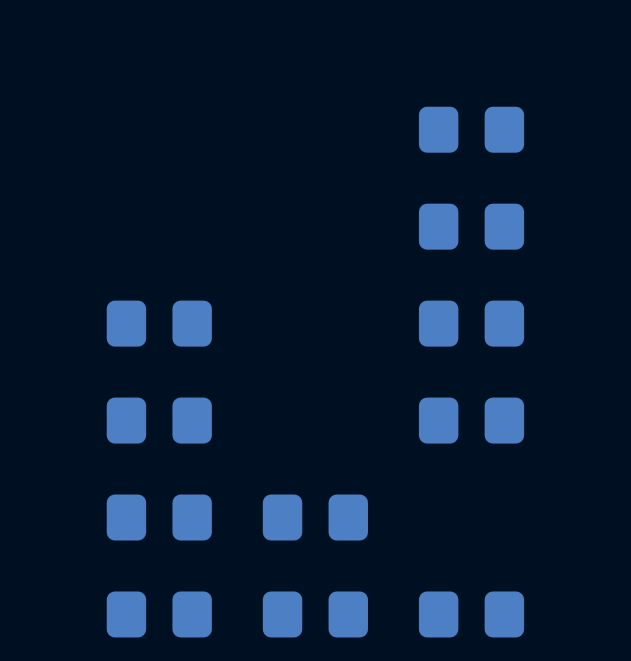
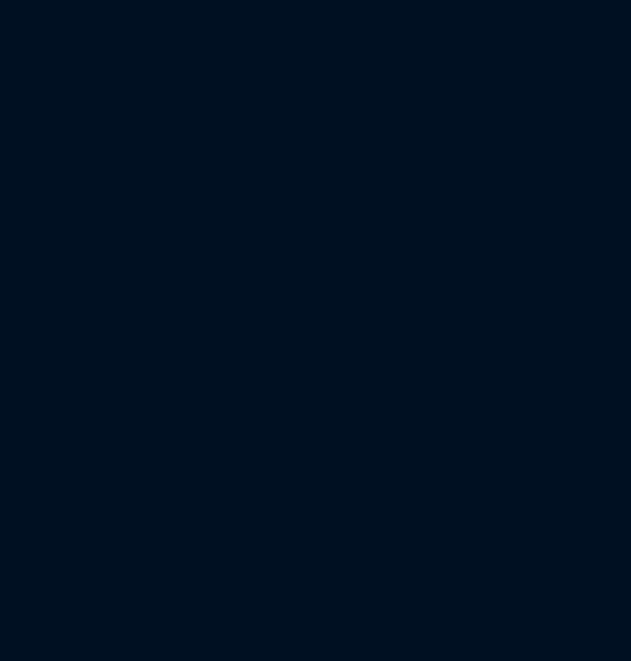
part: (471, 129) -> none
part: (471, 226) -> none
part: (159, 323) -> none
part: (471, 323) -> none
part: (159, 420) -> none
part: (471, 420) -> none
part: (159, 517) -> none
part: (315, 517) -> none
part: (159, 614) -> none
part: (315, 614) -> none
part: (471, 614) -> none

